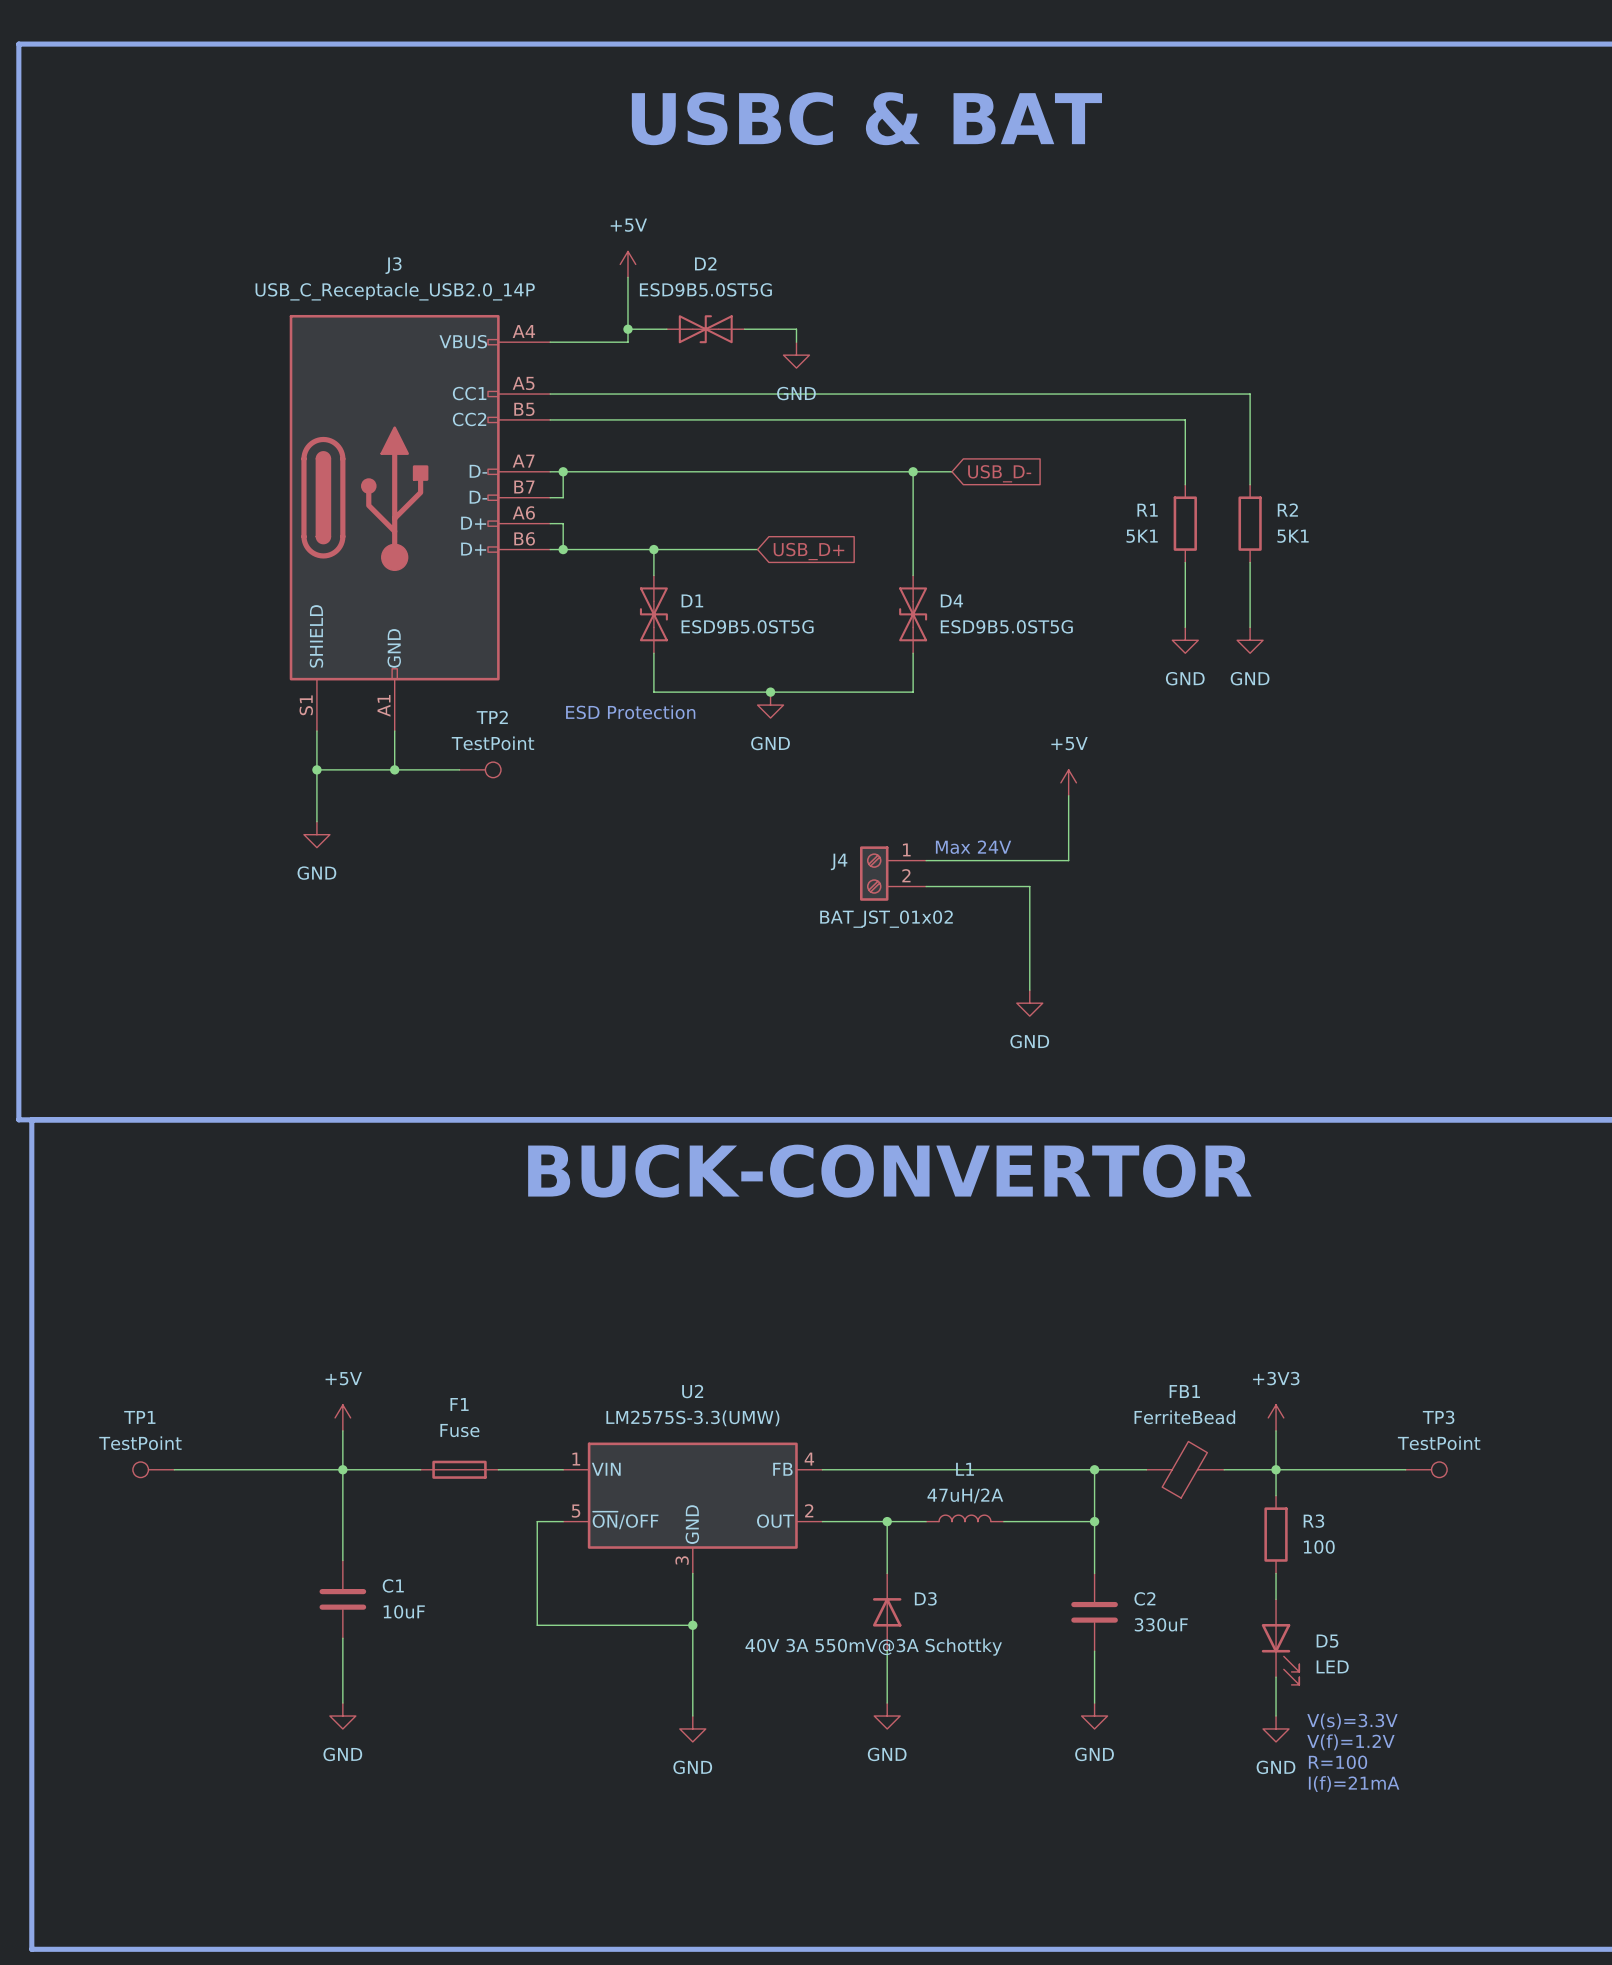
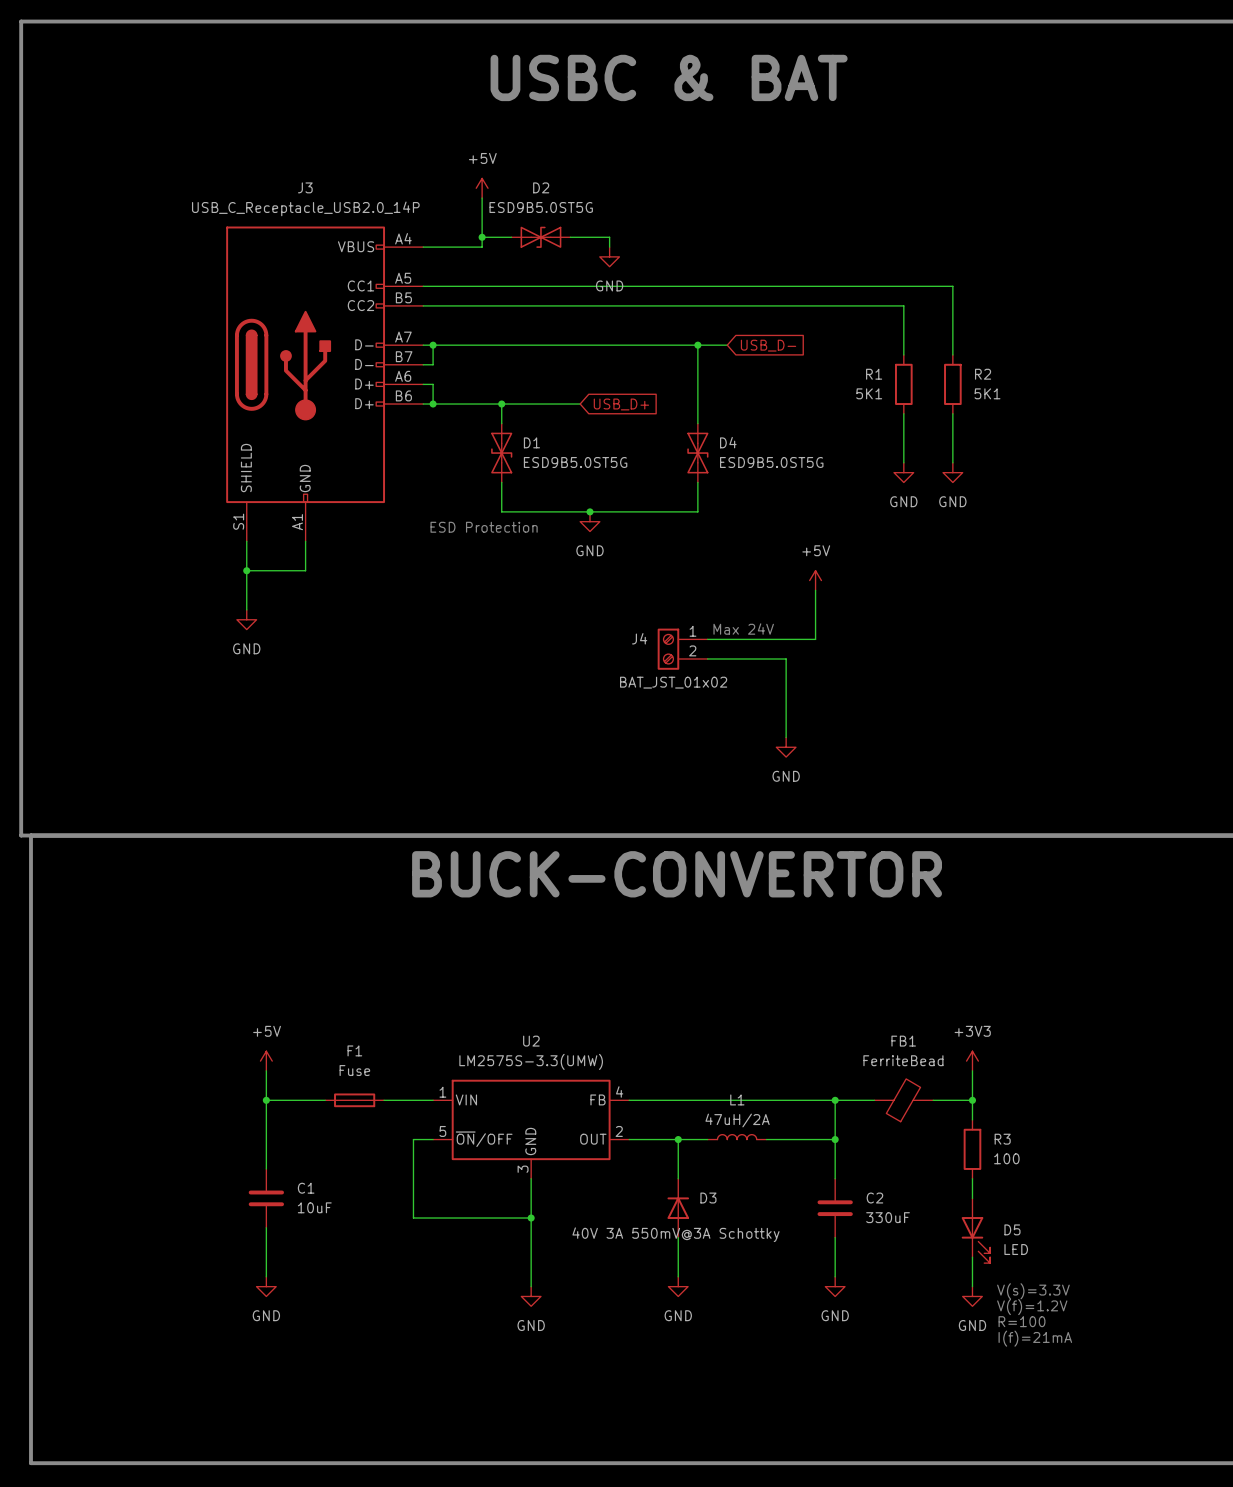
wire: (394, 769) (459, 769) -> none
junction: (394, 769) -> none
TP2: TestPoint (480, 769) -> none
TP1: TestPoint (153, 1469) -> none
wire: (174, 1469) (342, 1469) -> none
wire: (1276, 1469) (1405, 1469) -> none
TP3: TestPoint (1426, 1469) -> none

